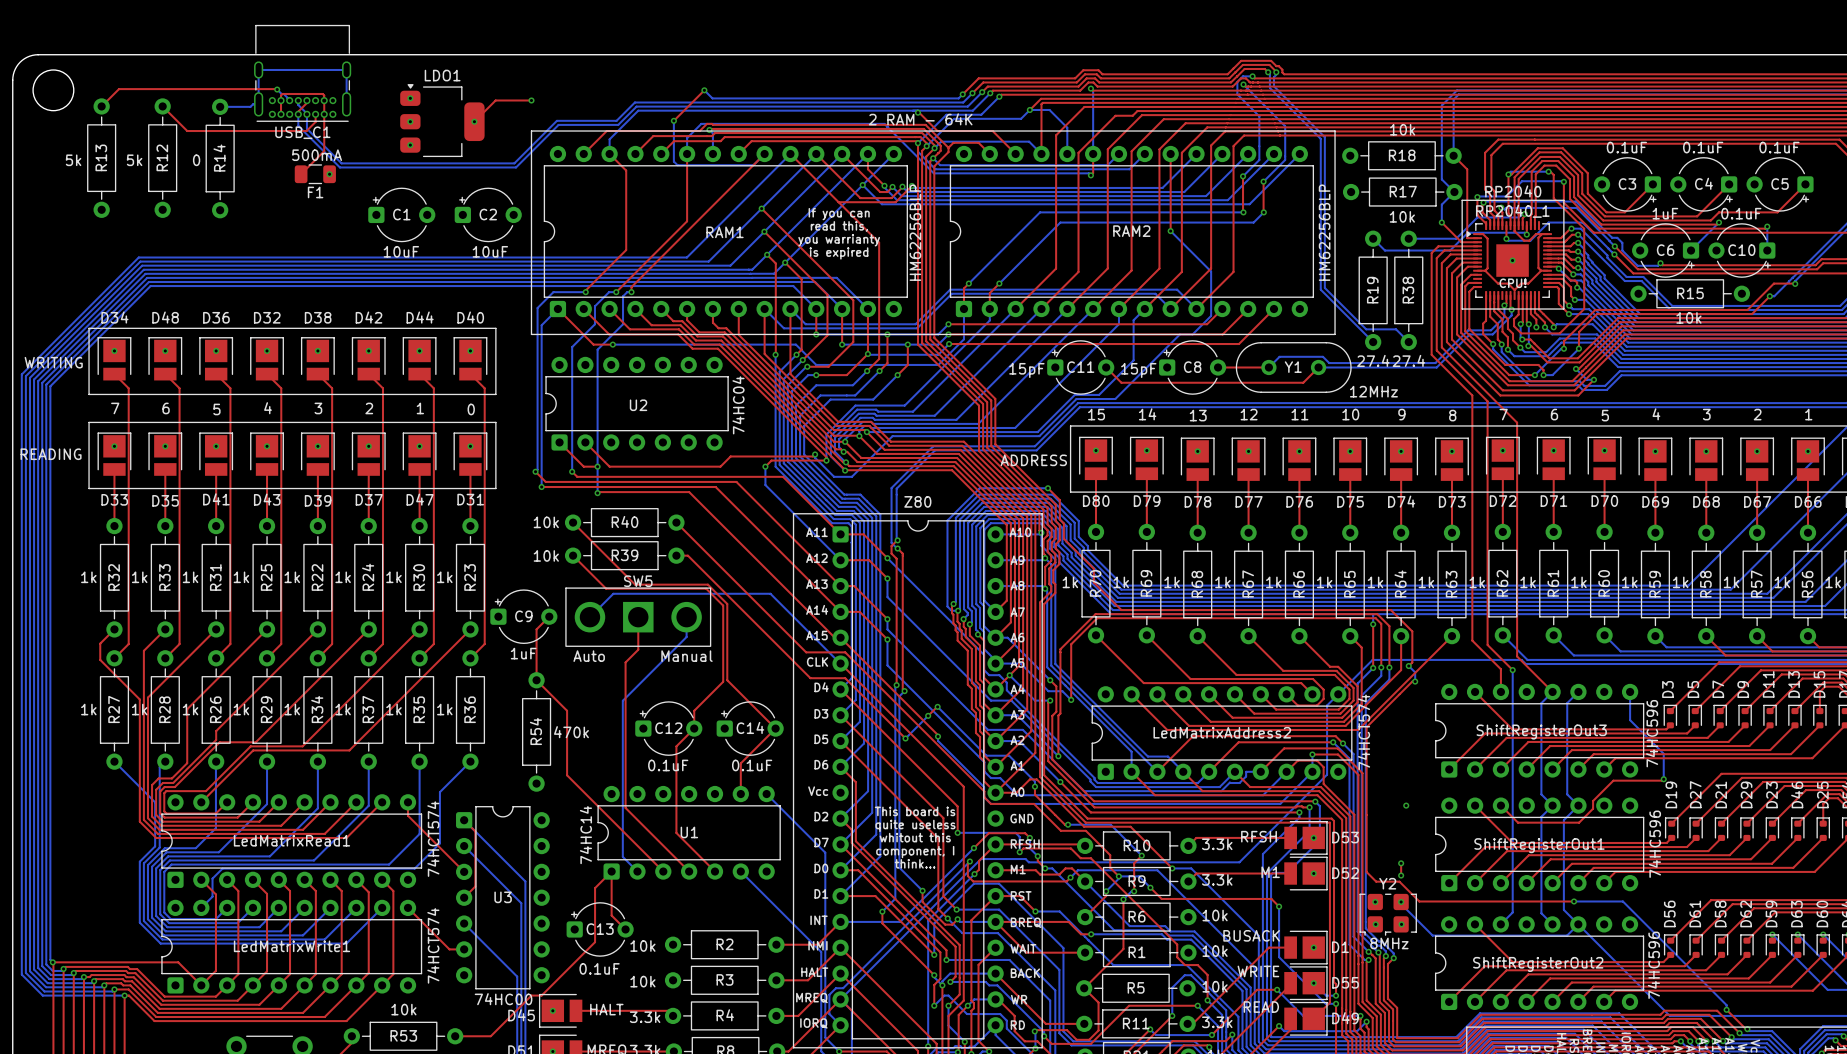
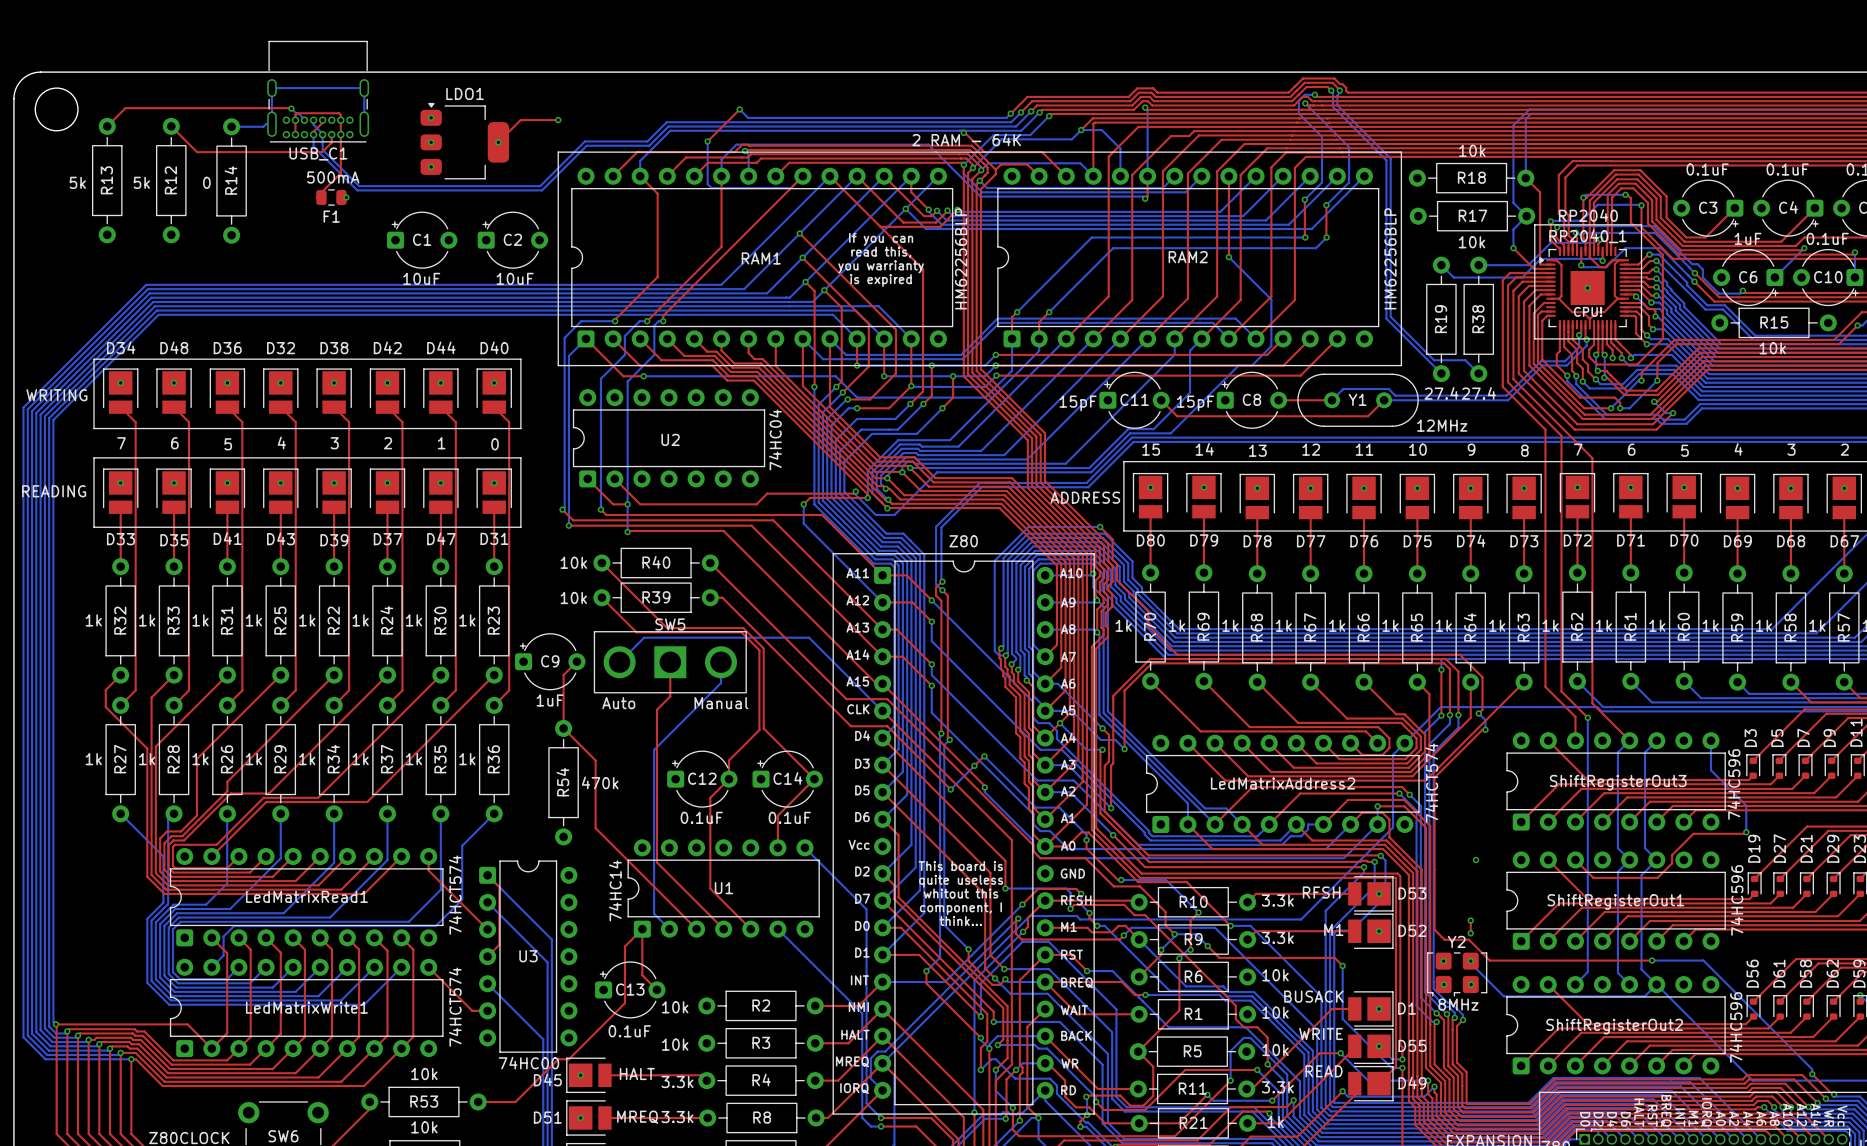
F1 footprint: [294, 164, 336, 185] -> [316, 189, 347, 206]

